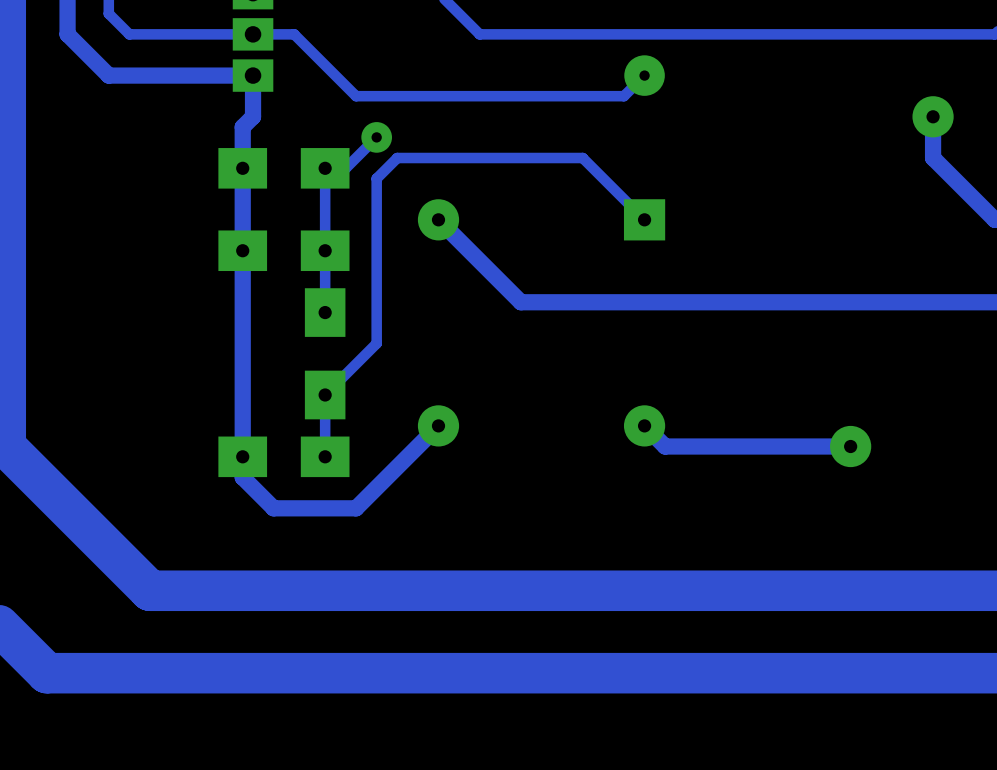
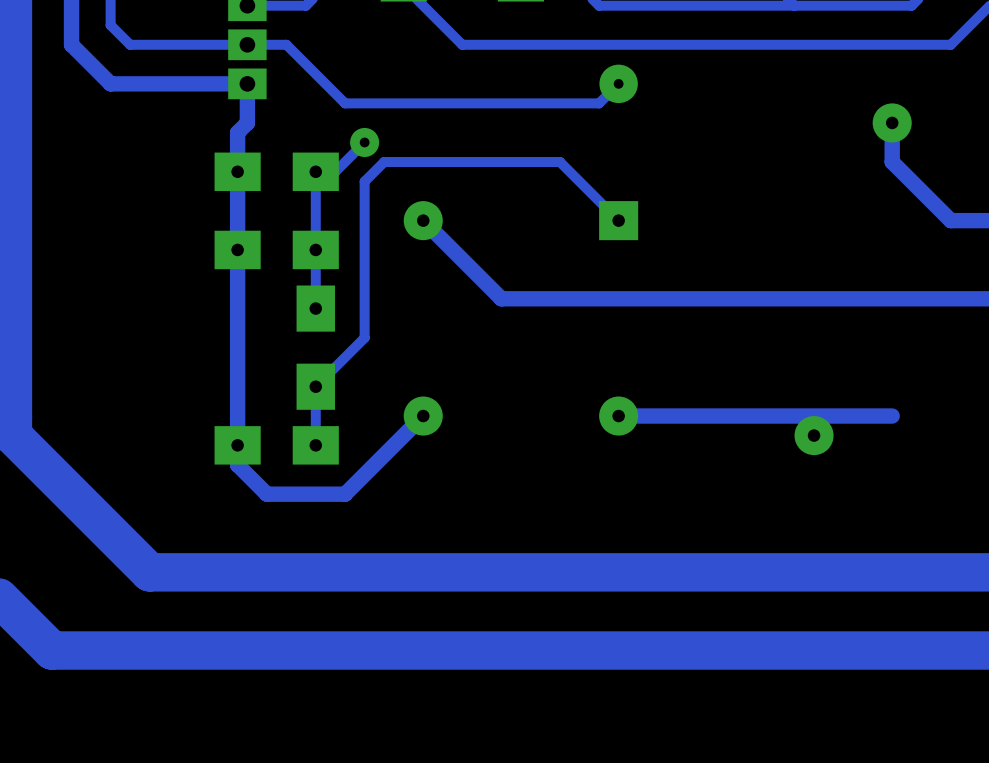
track: (644, 425) (665, 446) (850, 446) -> (618, 416) (892, 416)

